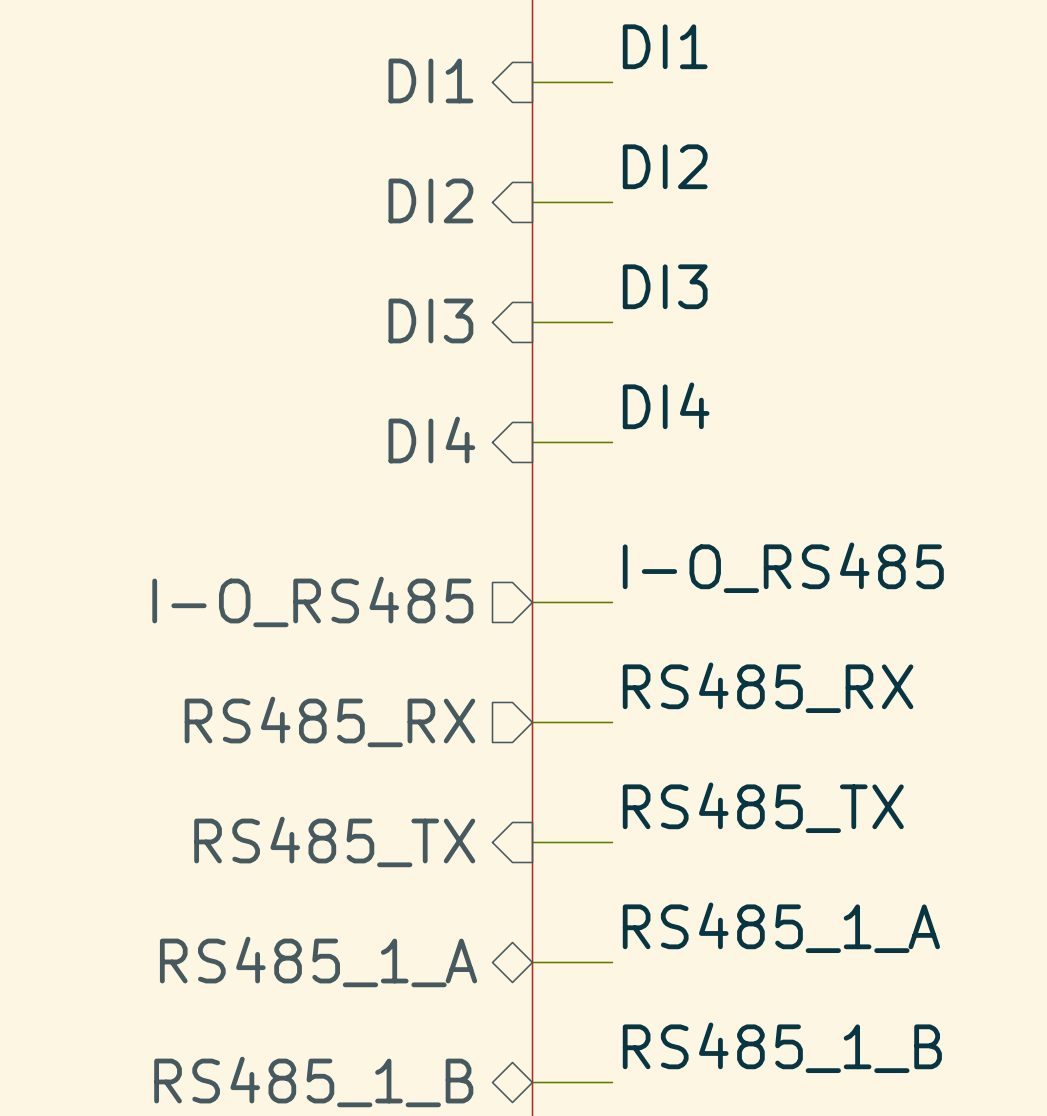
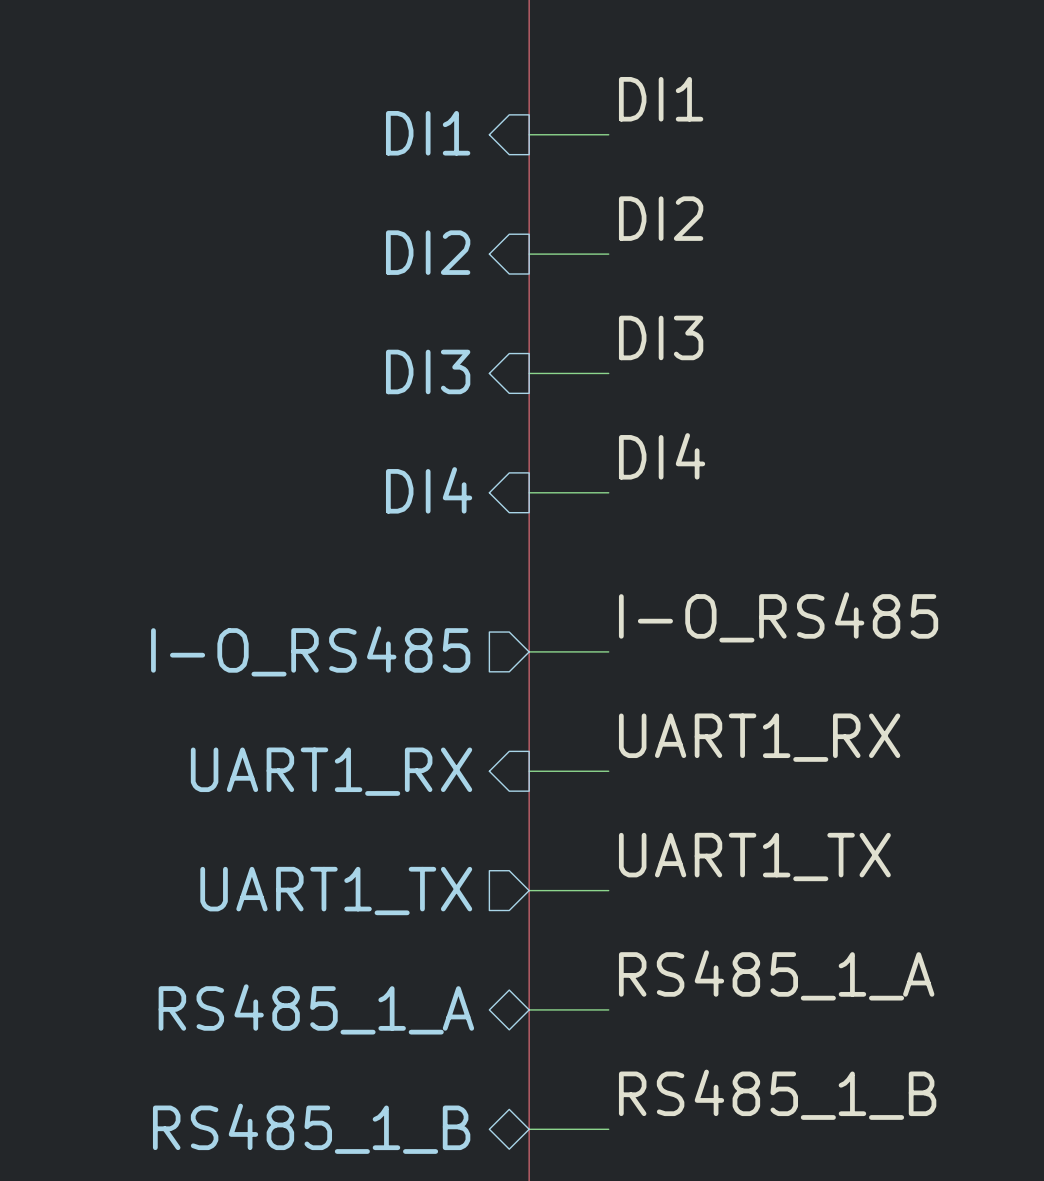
label: RS485_RX (768, 687) -> UART1_RX (759, 737)
sheet pin shape: output (329, 721) -> input (331, 771)
sheet pin: RS485_RX (329, 721) -> UART1_RX (331, 771)
label: RS485_TX (763, 807) -> UART1_TX (754, 857)
sheet pin shape: input (334, 841) -> output (336, 891)
sheet pin: RS485_TX (334, 841) -> UART1_TX (336, 891)

